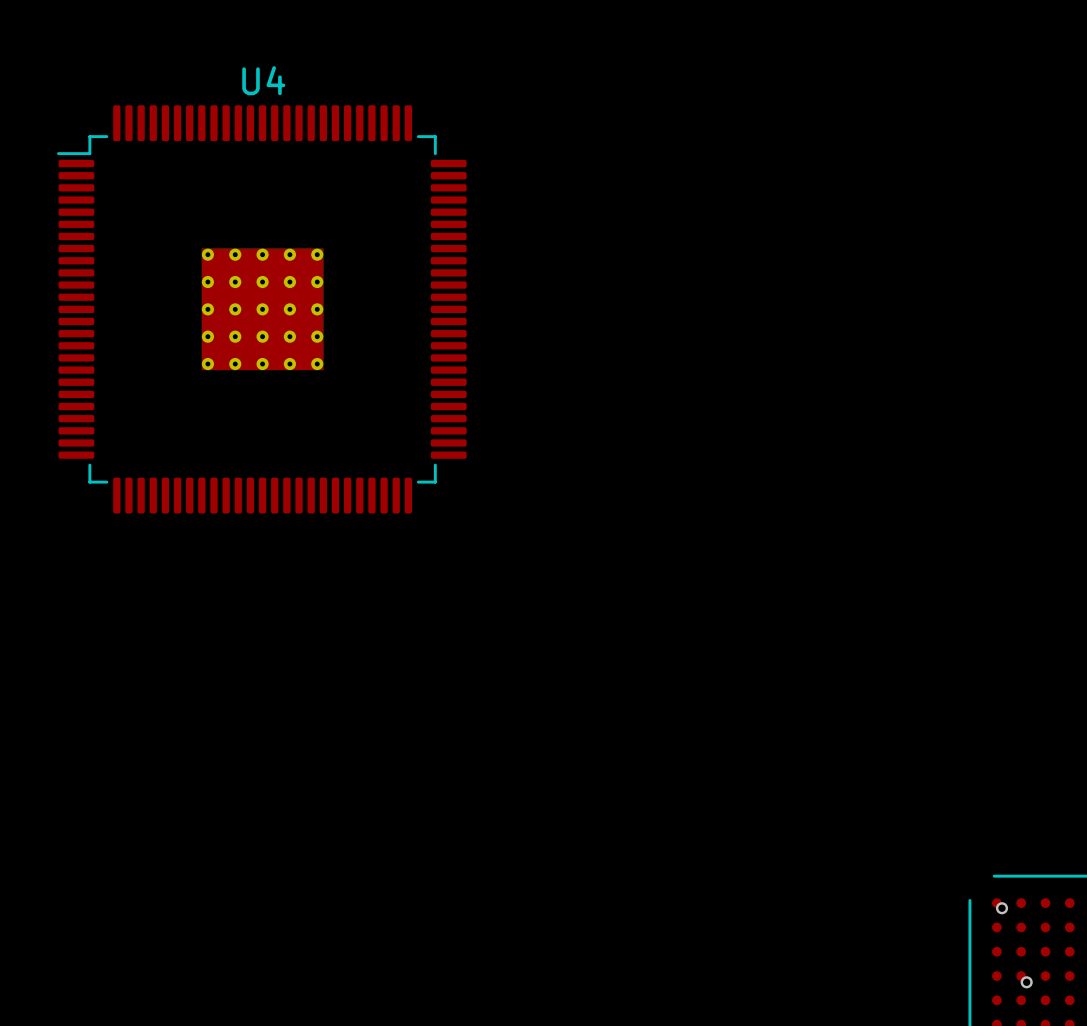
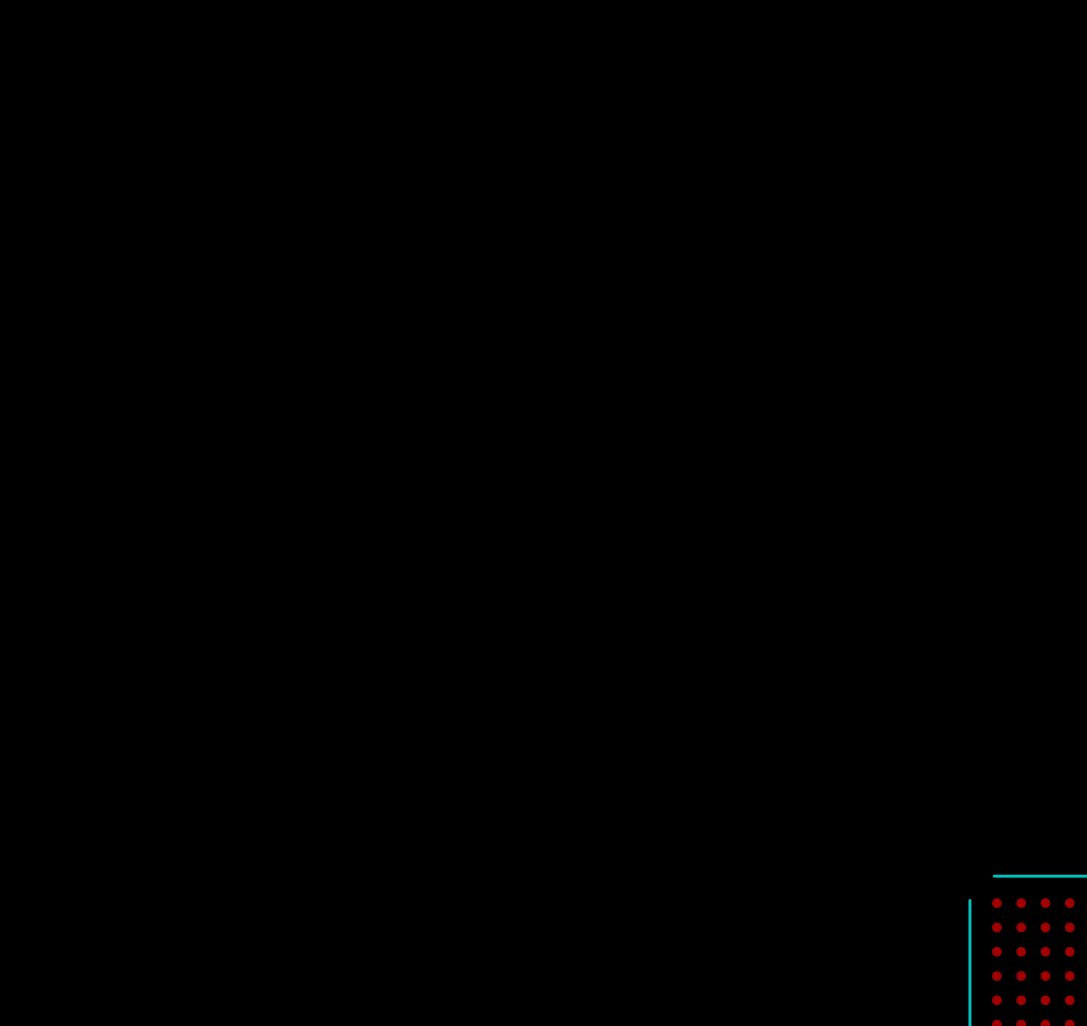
U4: (261, 309) -> none
via: (1002, 908) -> none
via: (1026, 982) -> none

